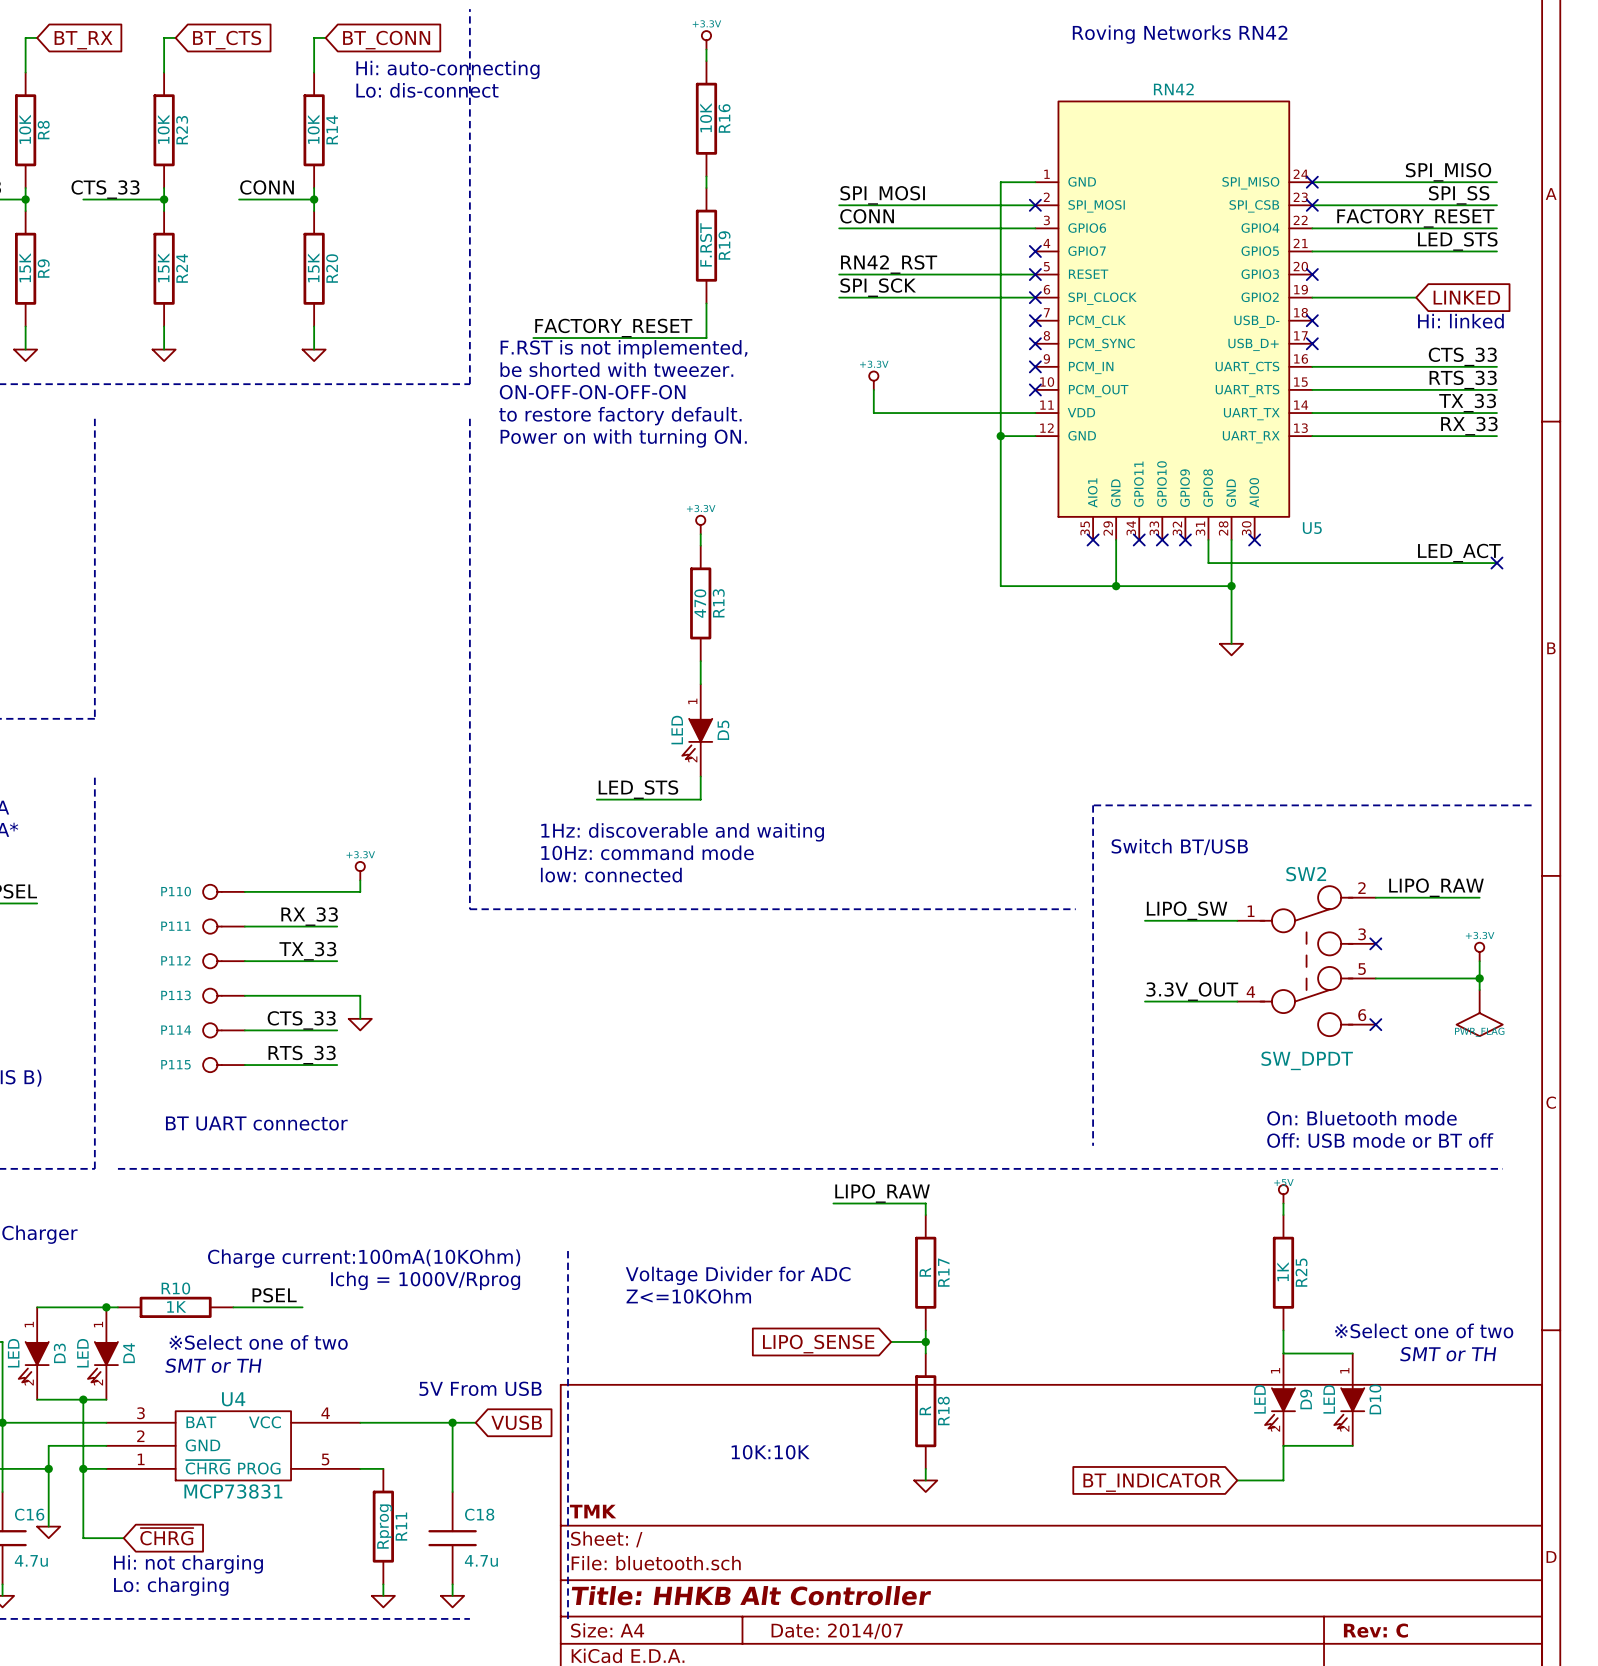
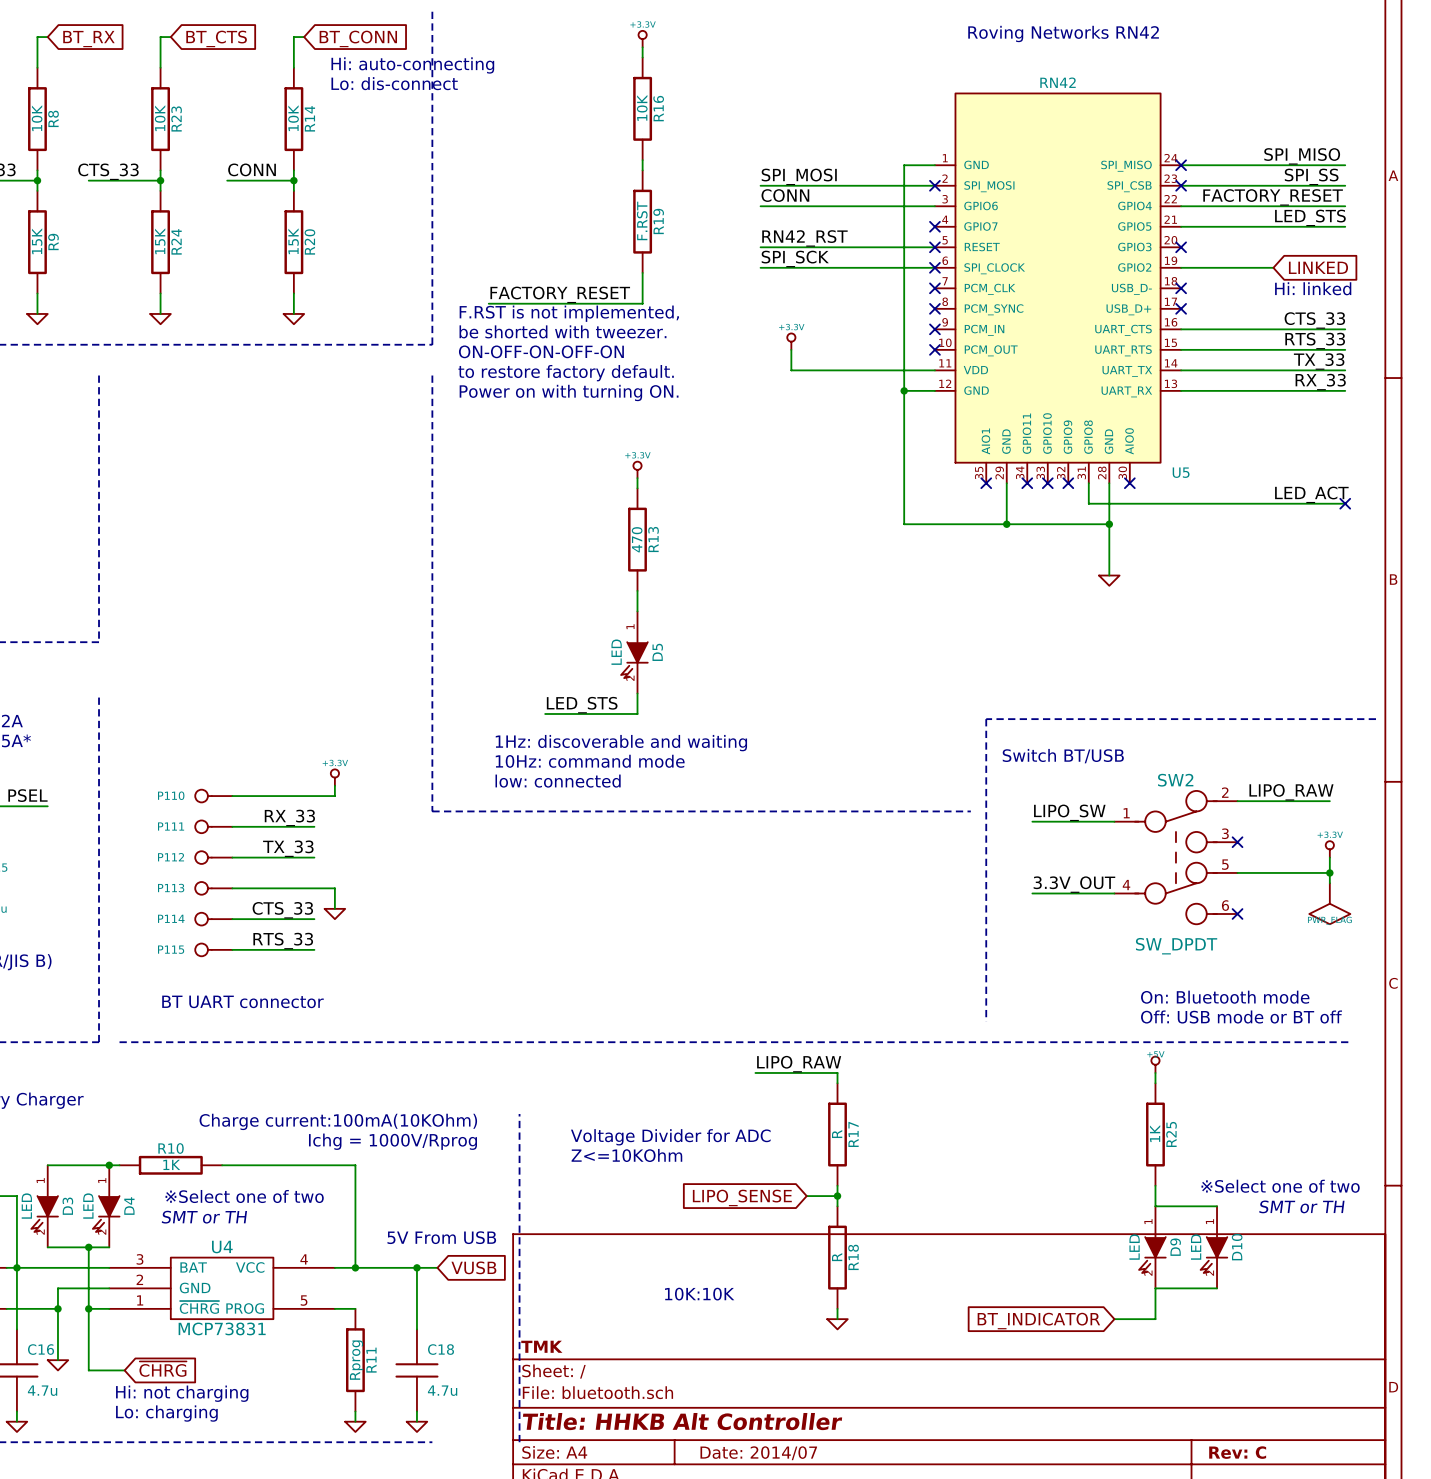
label: PSEL (274, 1295) -> none
wire: none -> (283, 1165) (355, 1165) (355, 1267)
junction: none -> (355, 1267)

